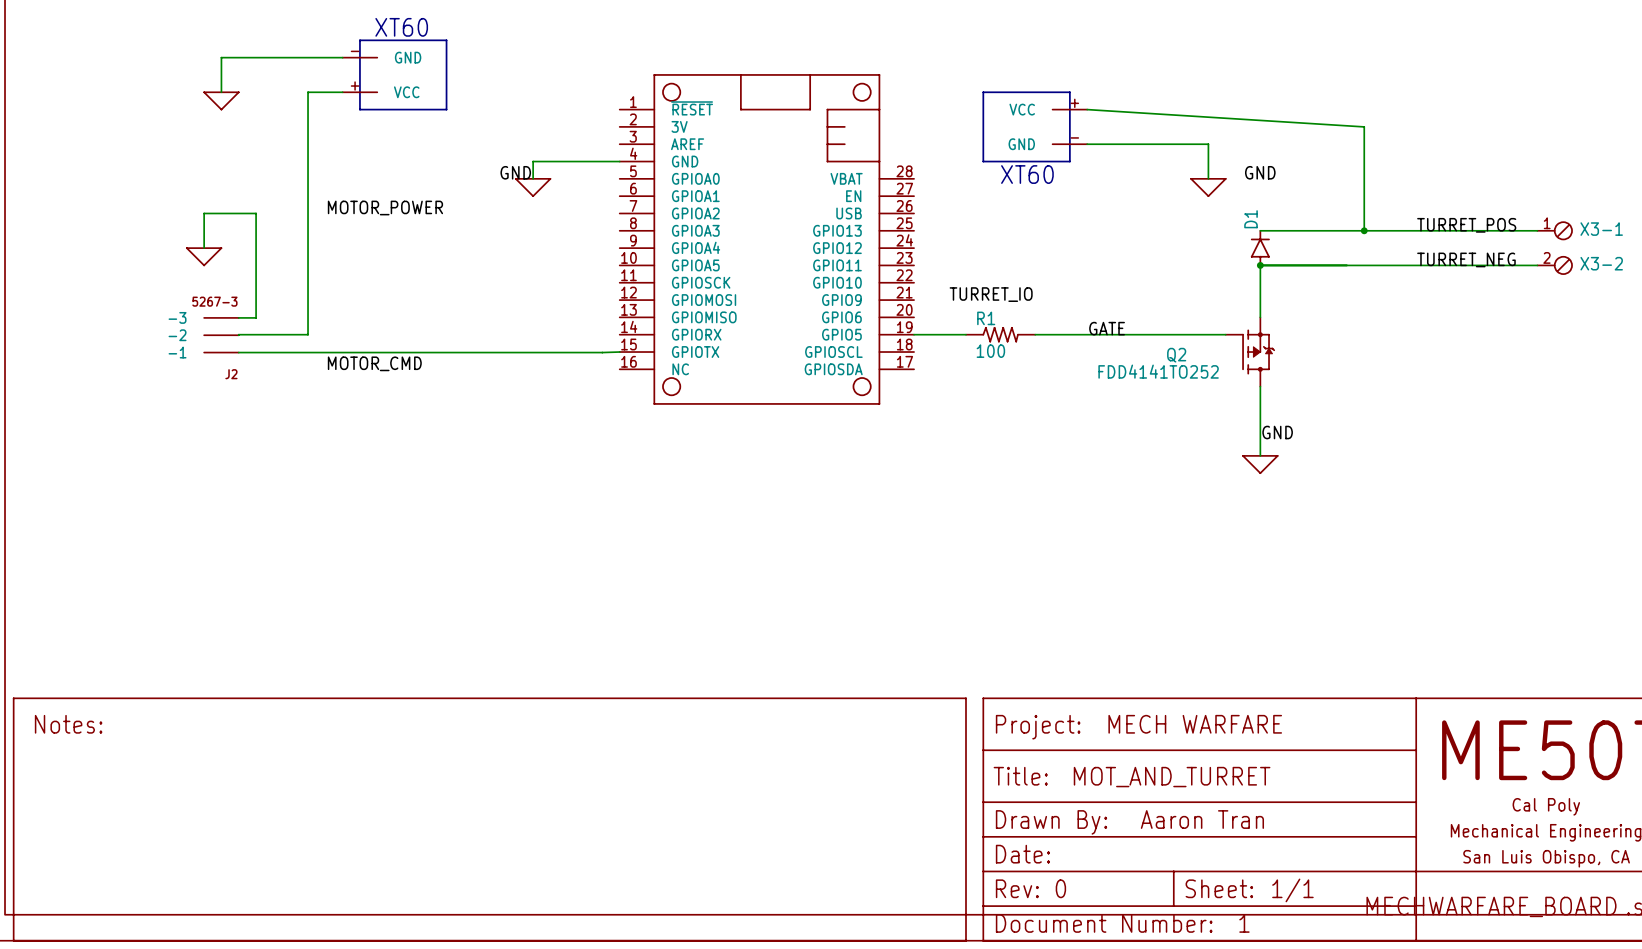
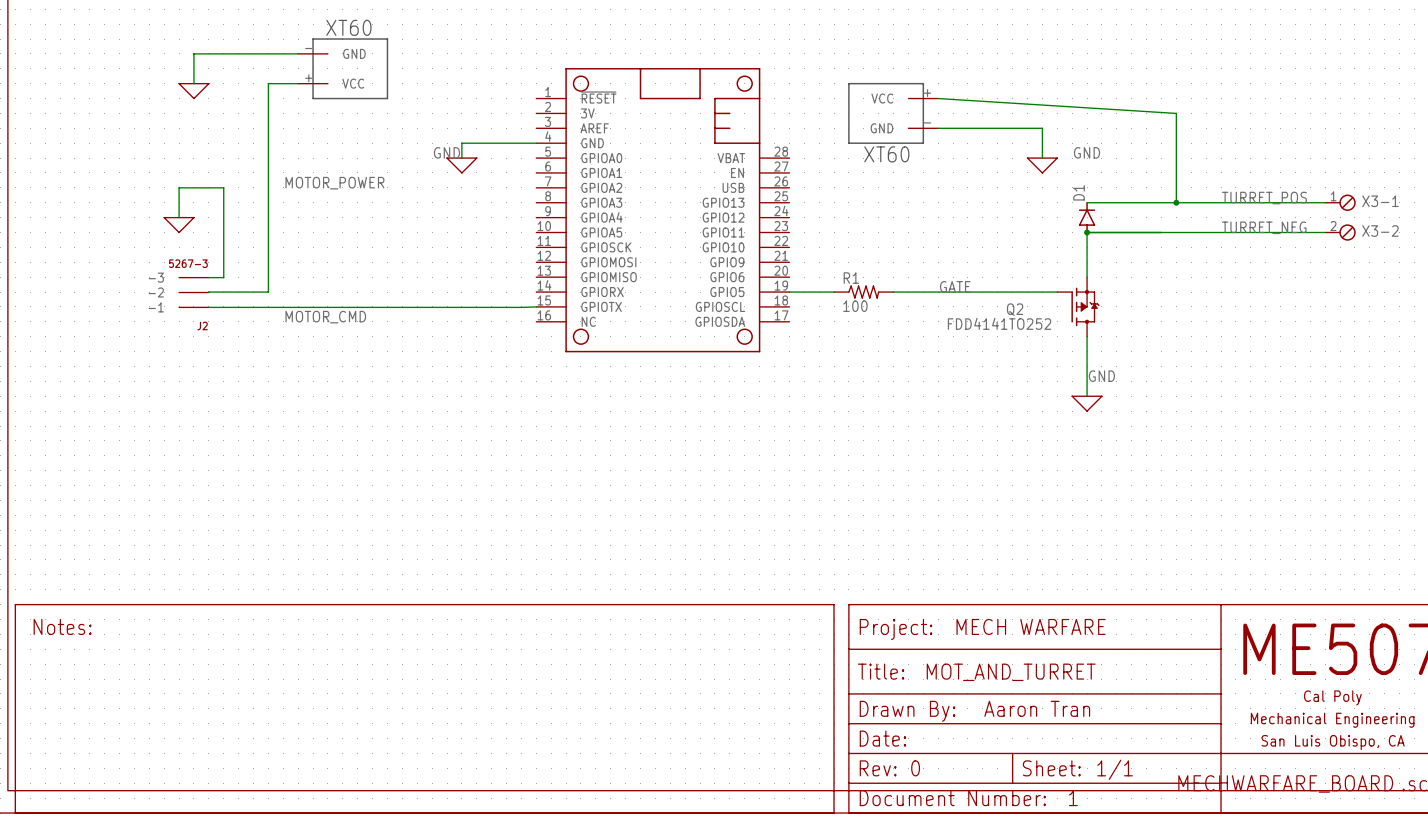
label: TURRET_IO (991, 294) -> none

